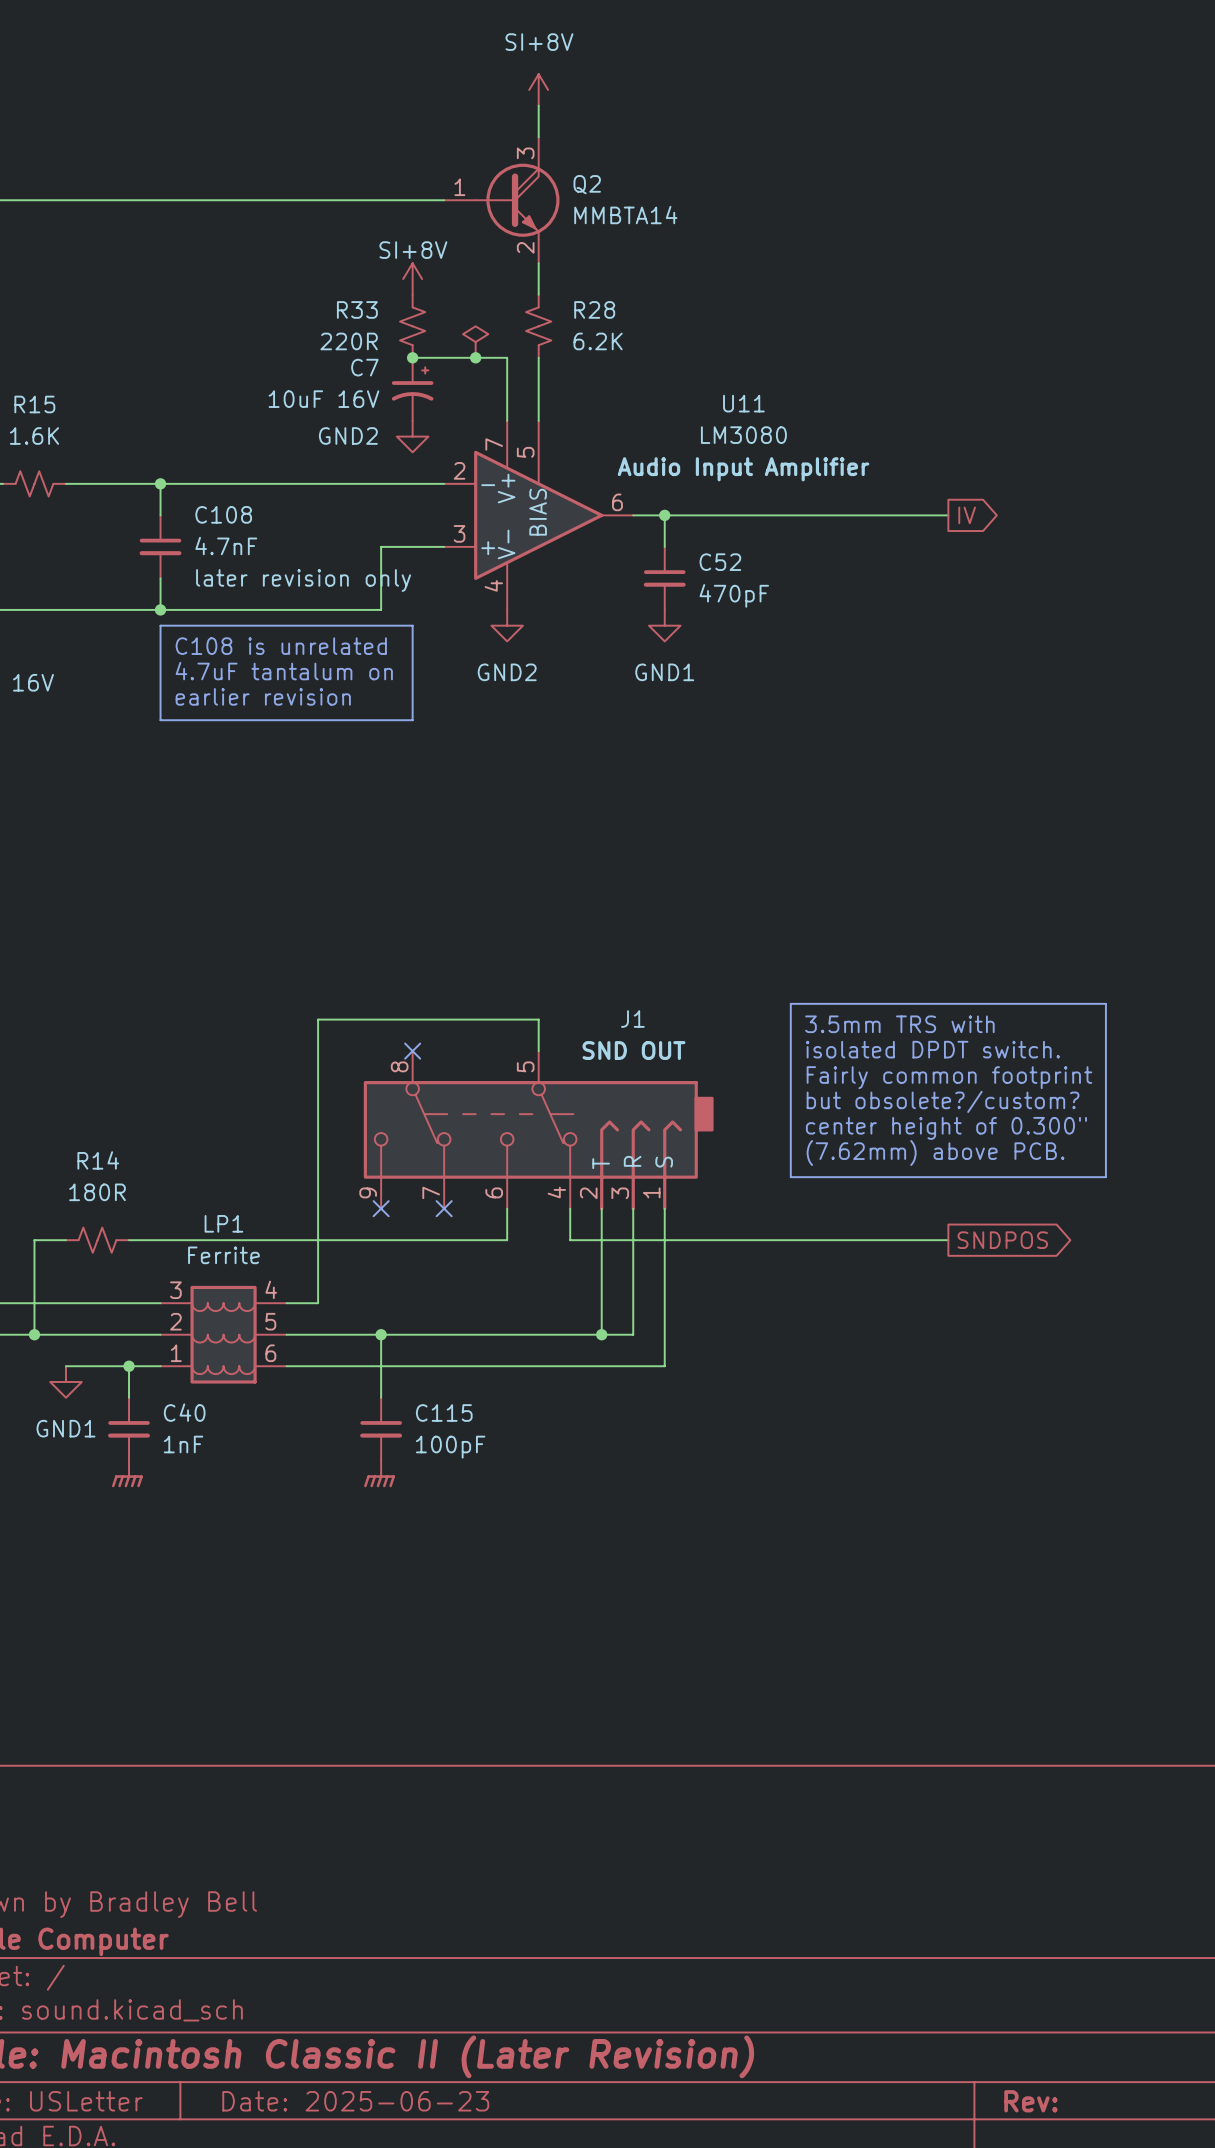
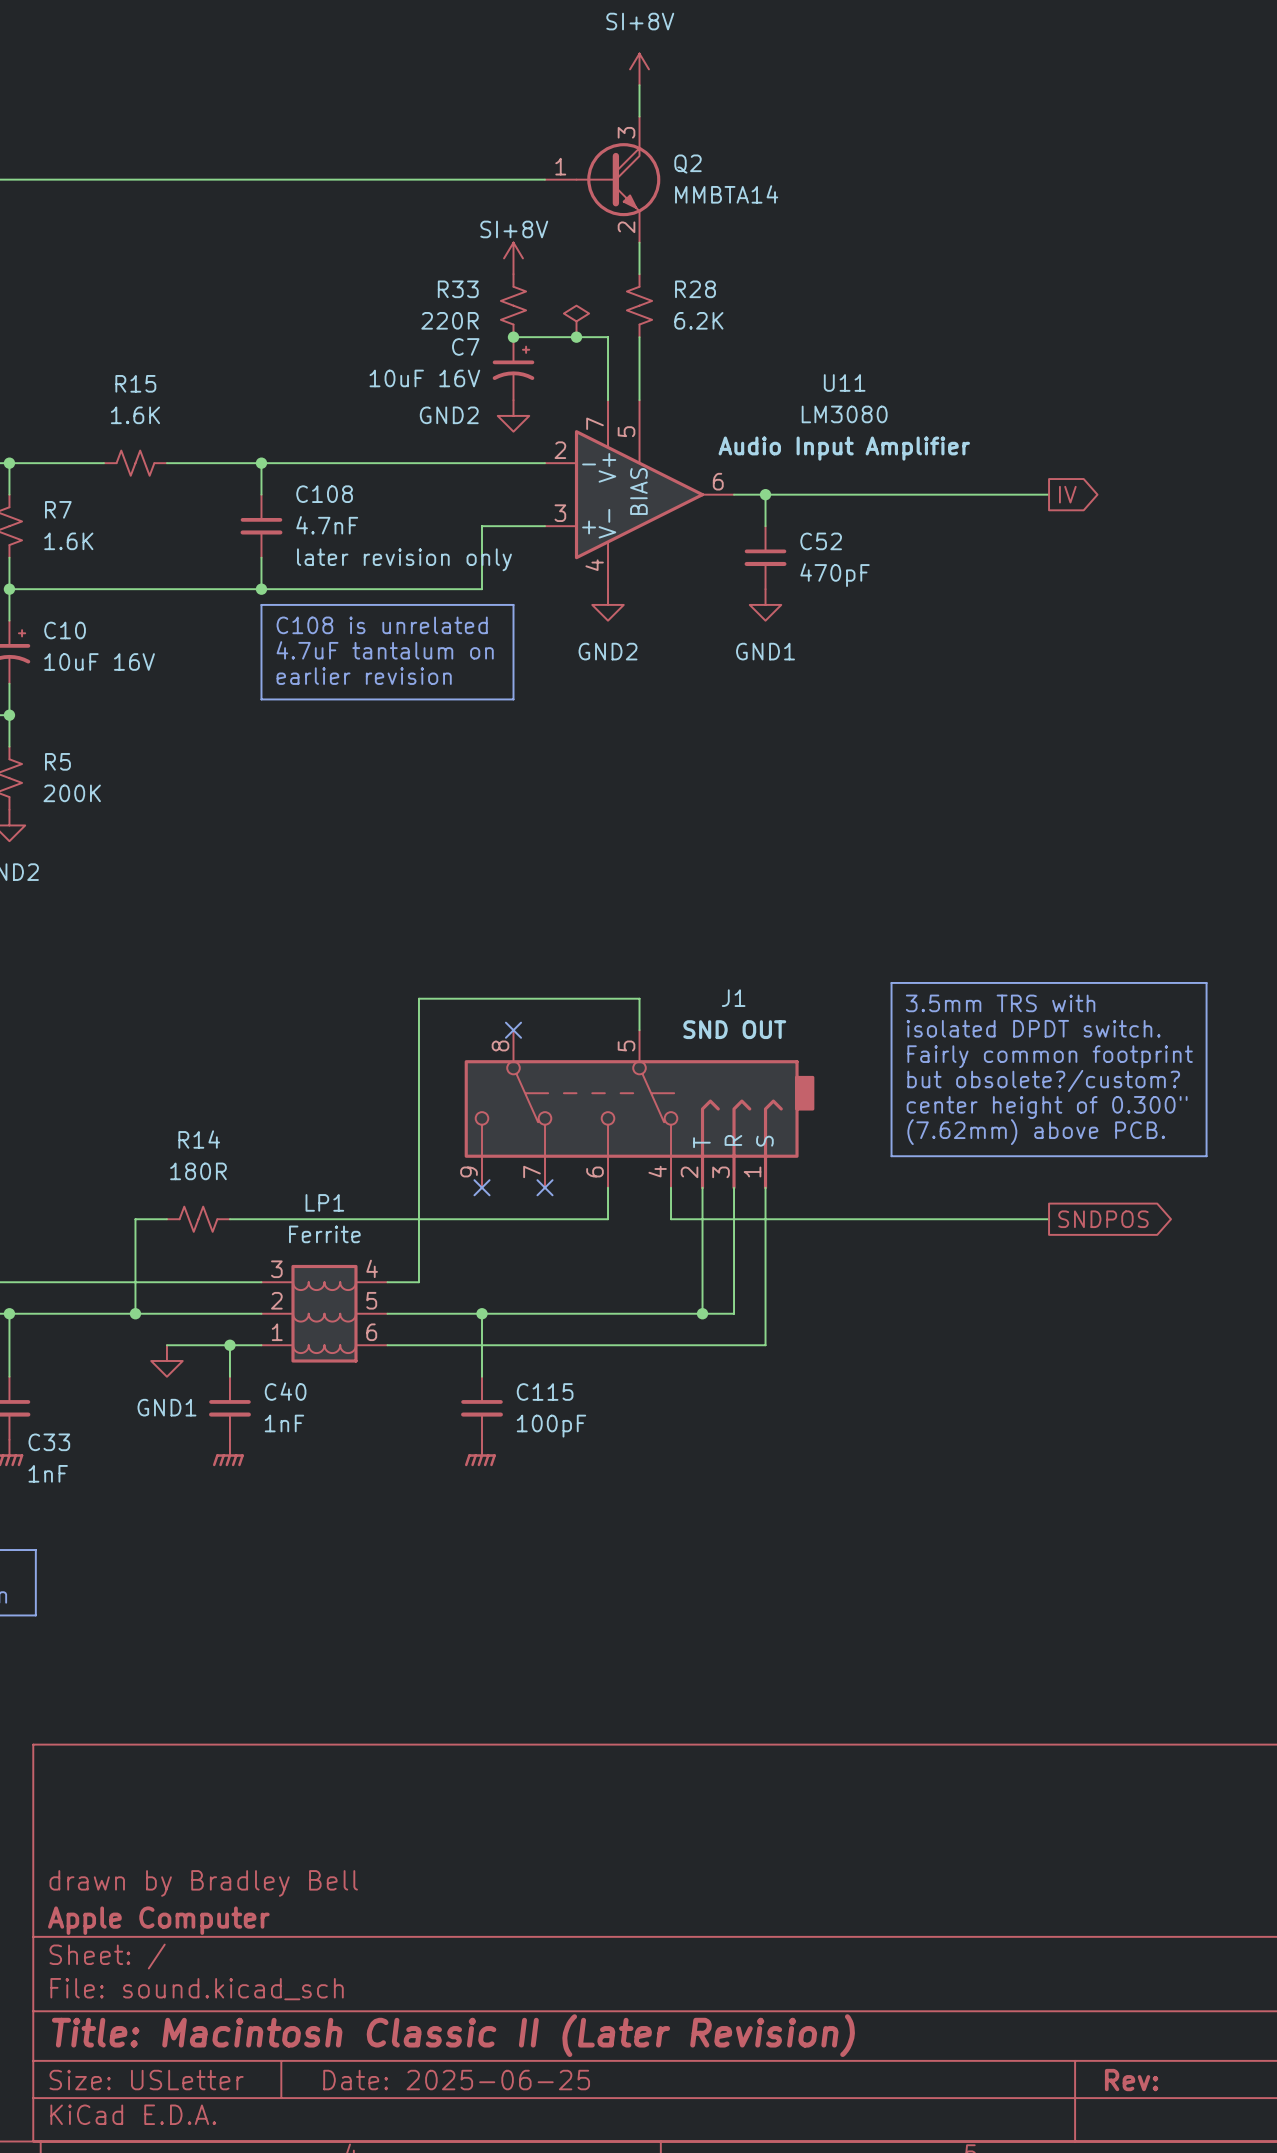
title block: Date: 2025-06-23 (355, 2101) -> Date: 2025-06-25 (456, 2080)

